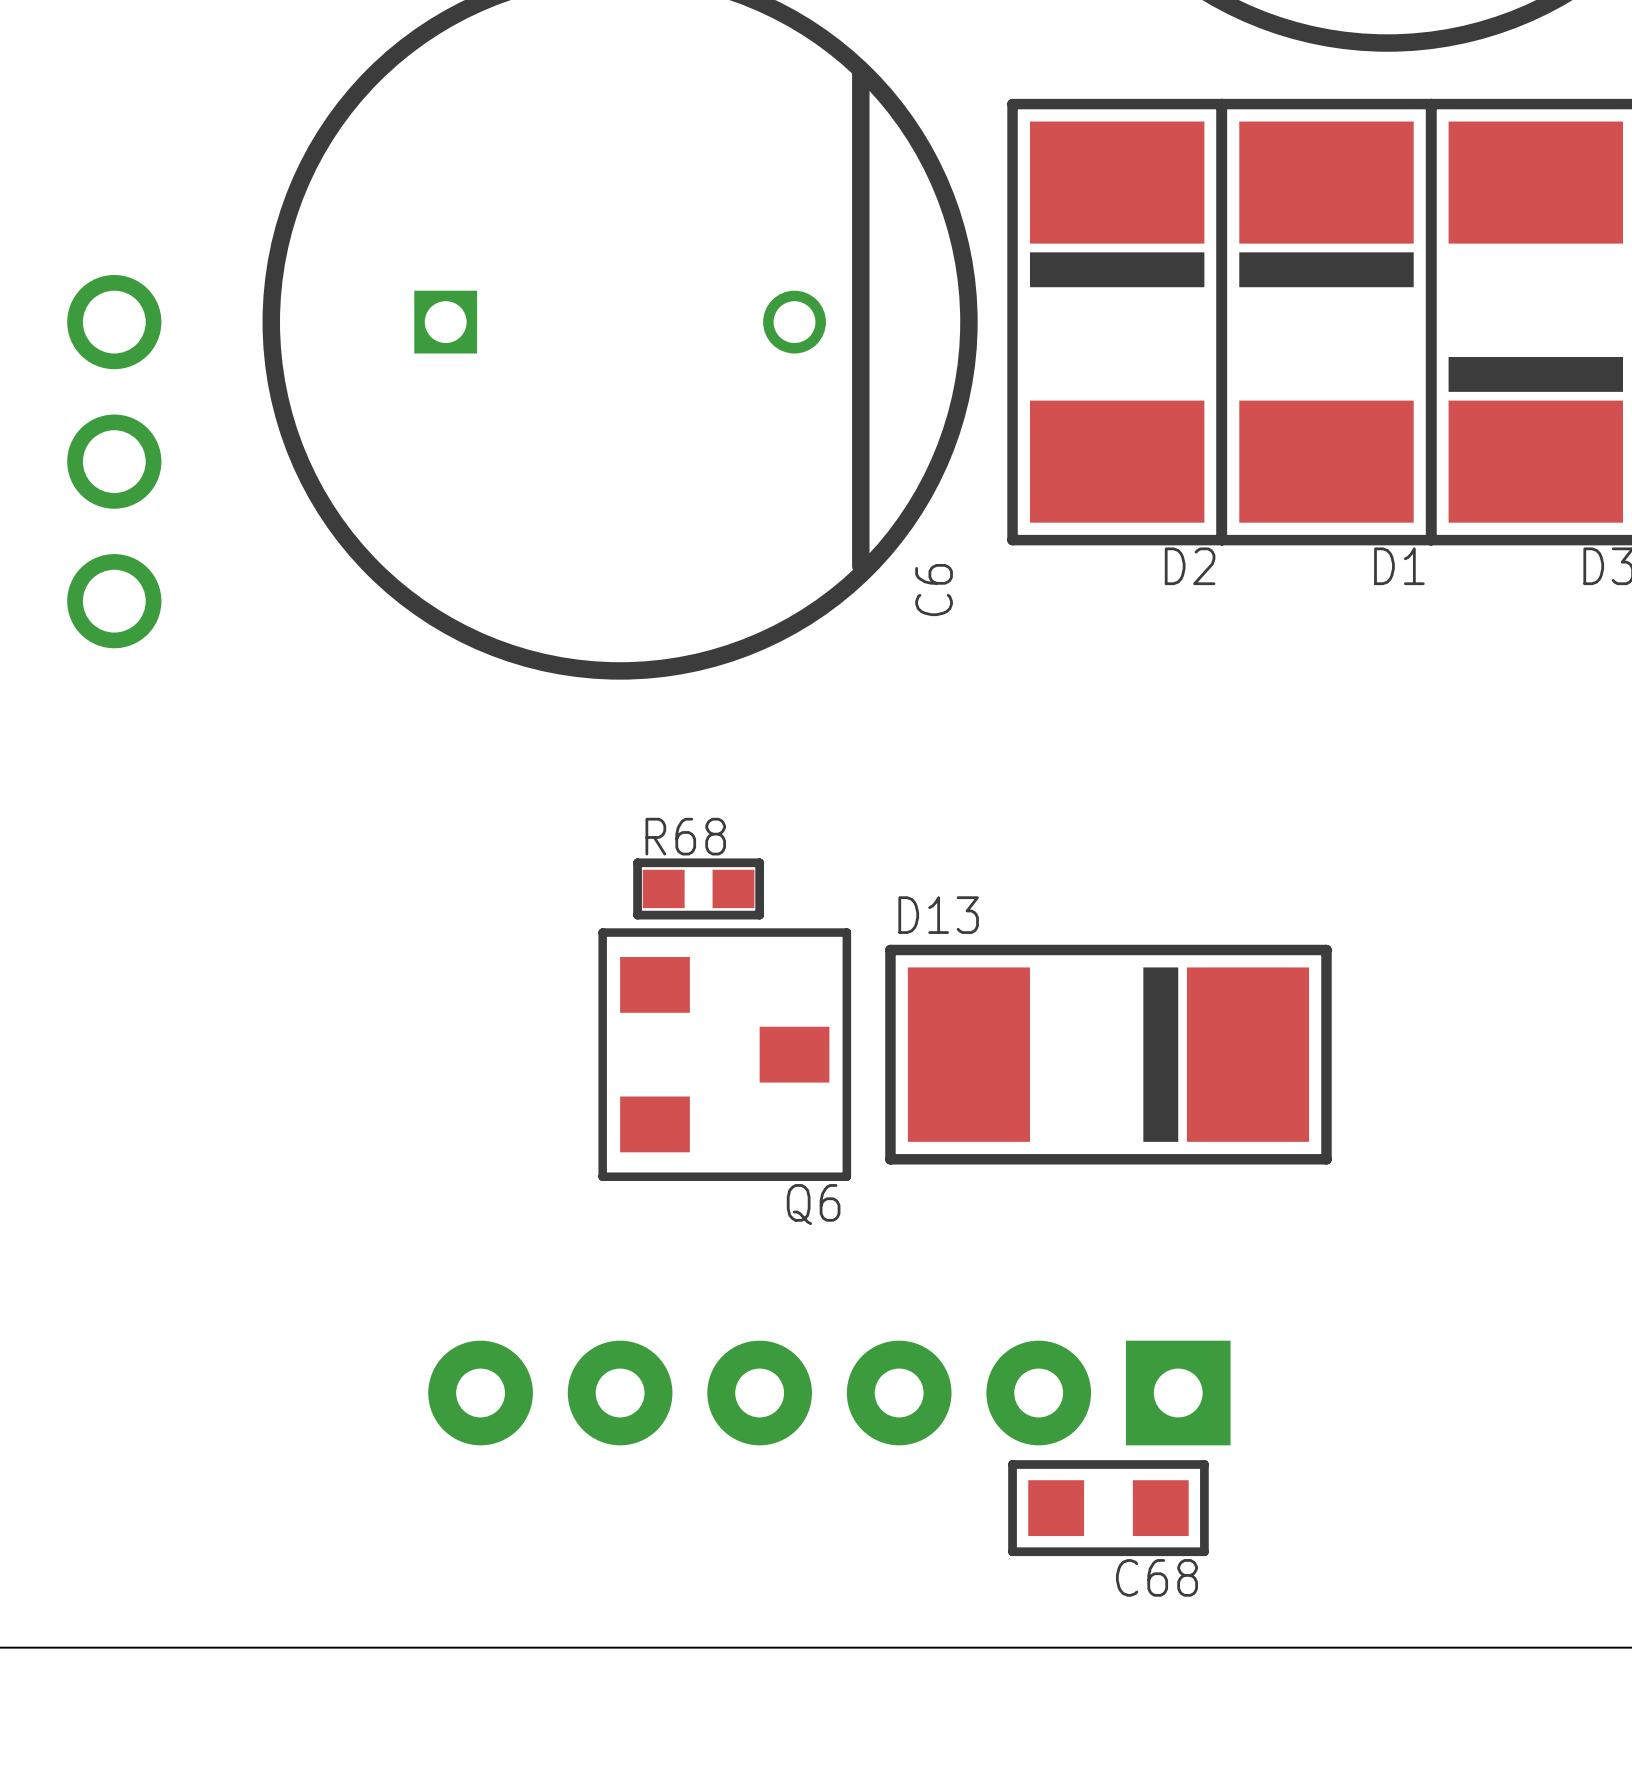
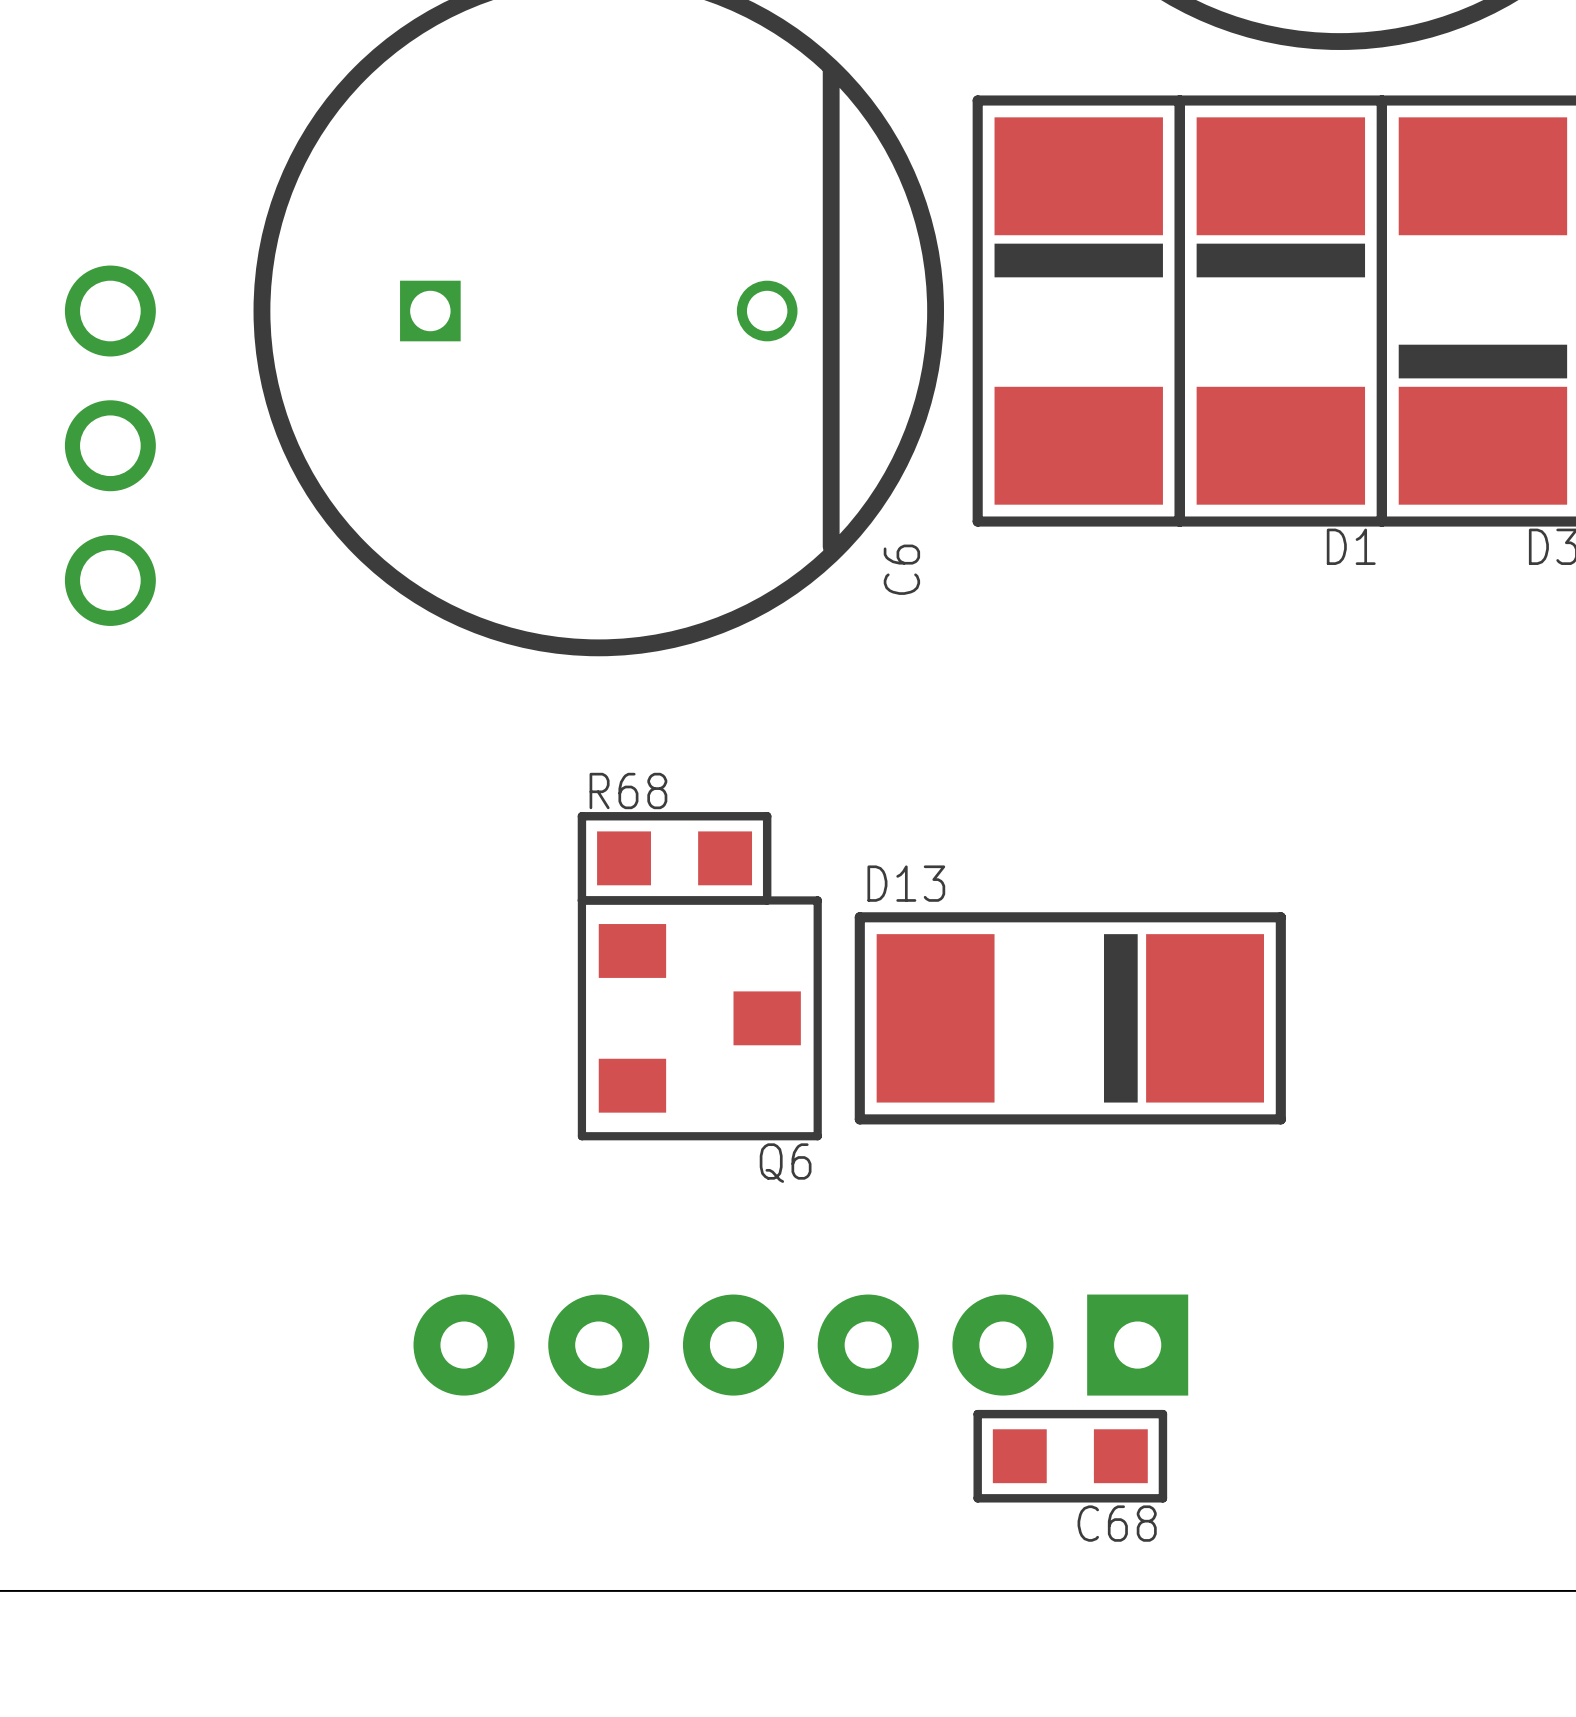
D2 name: D2 (1190, 566) -> none
R68 name position: R68 (685, 836) -> R68 (628, 790)
R68 footprint: [633, 858, 765, 920] -> [577, 812, 772, 905]

